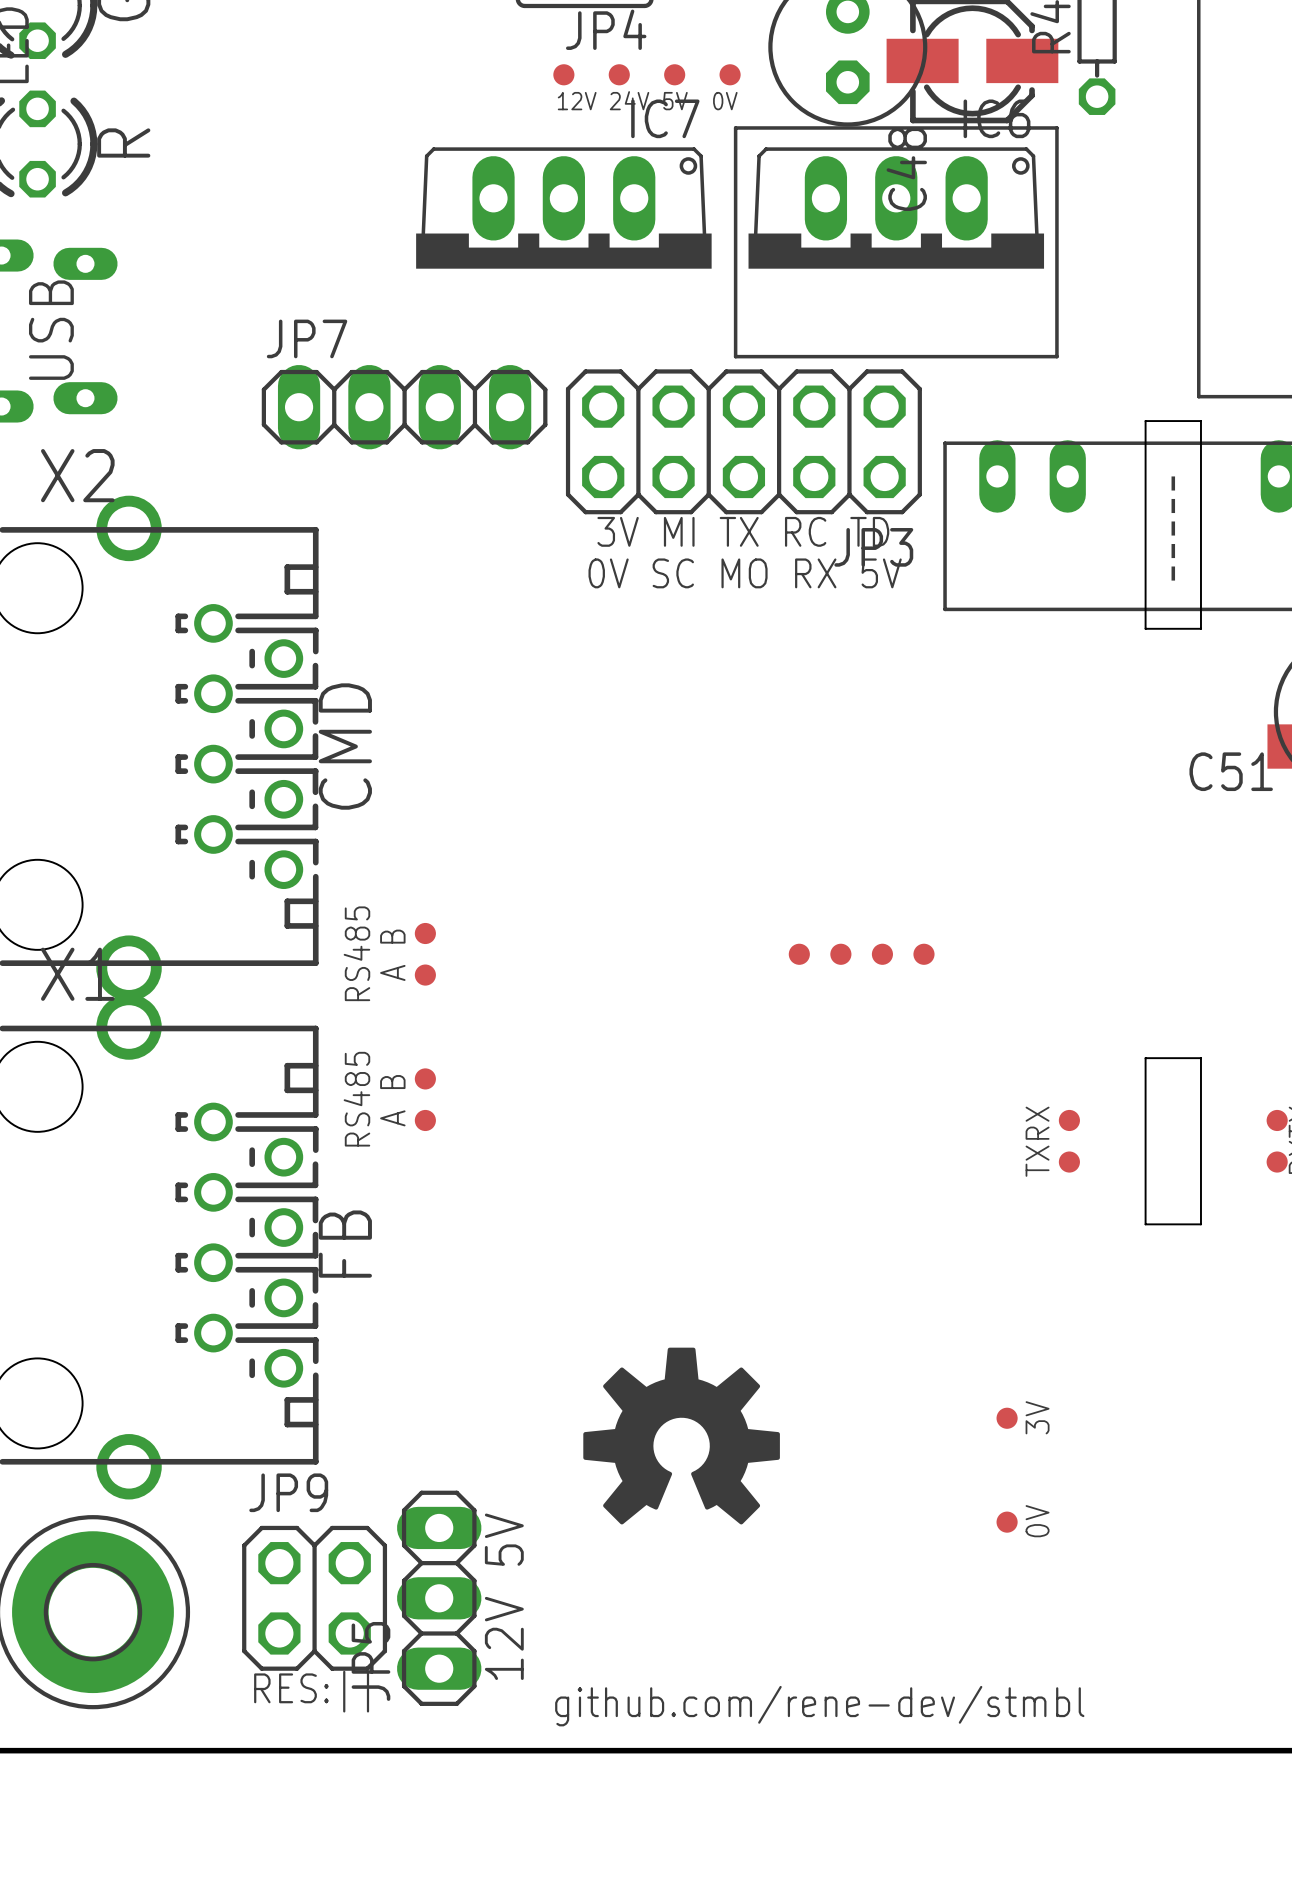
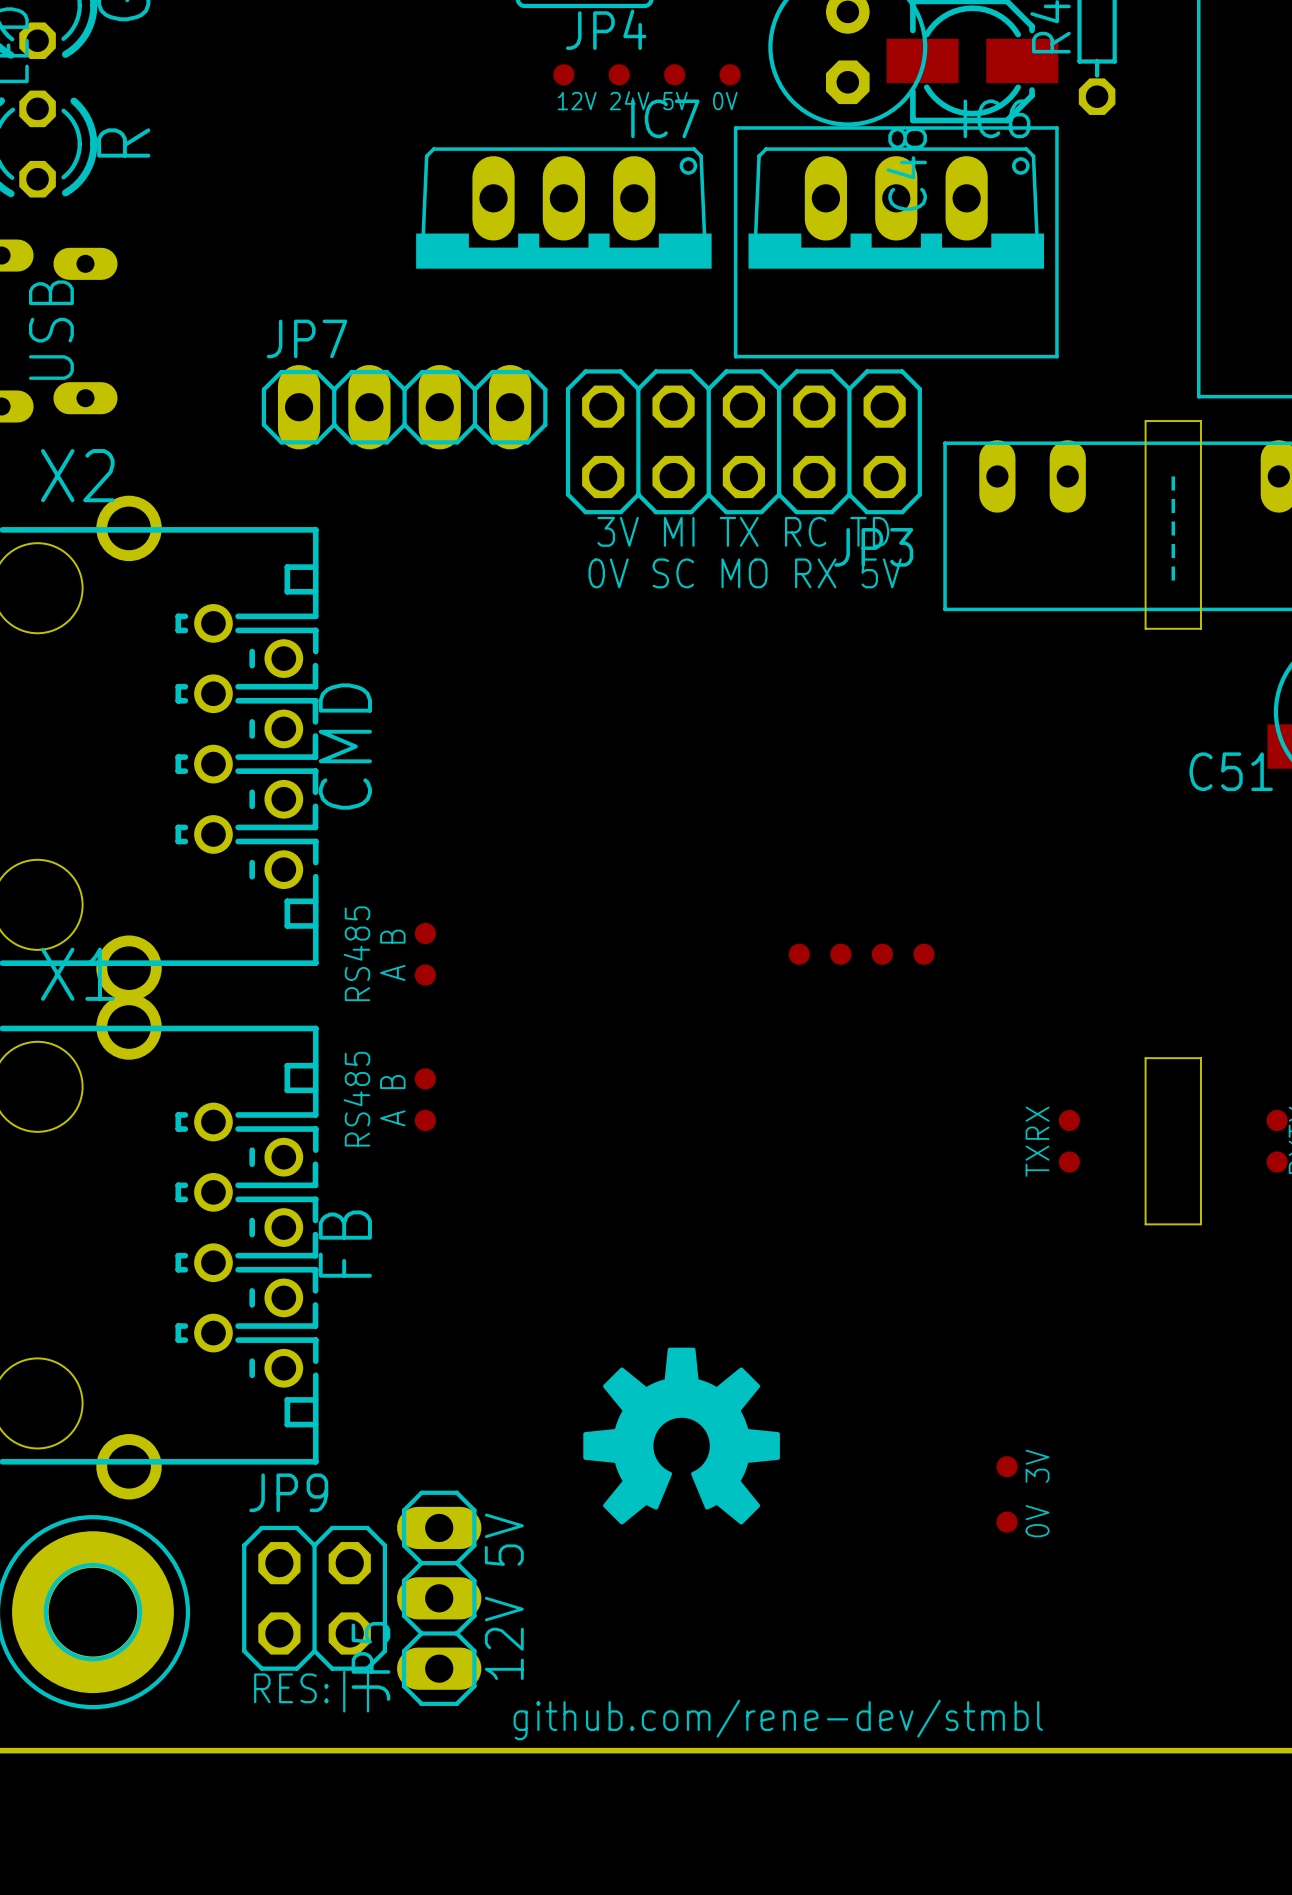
text position: 3V (1037, 1417) -> 3V (1037, 1466)
part position: (1007, 1418) -> (1007, 1466)
text position: github.com/rene-dev/stmbl (819, 1706) -> github.com/rene-dev/stmbl (778, 1719)

